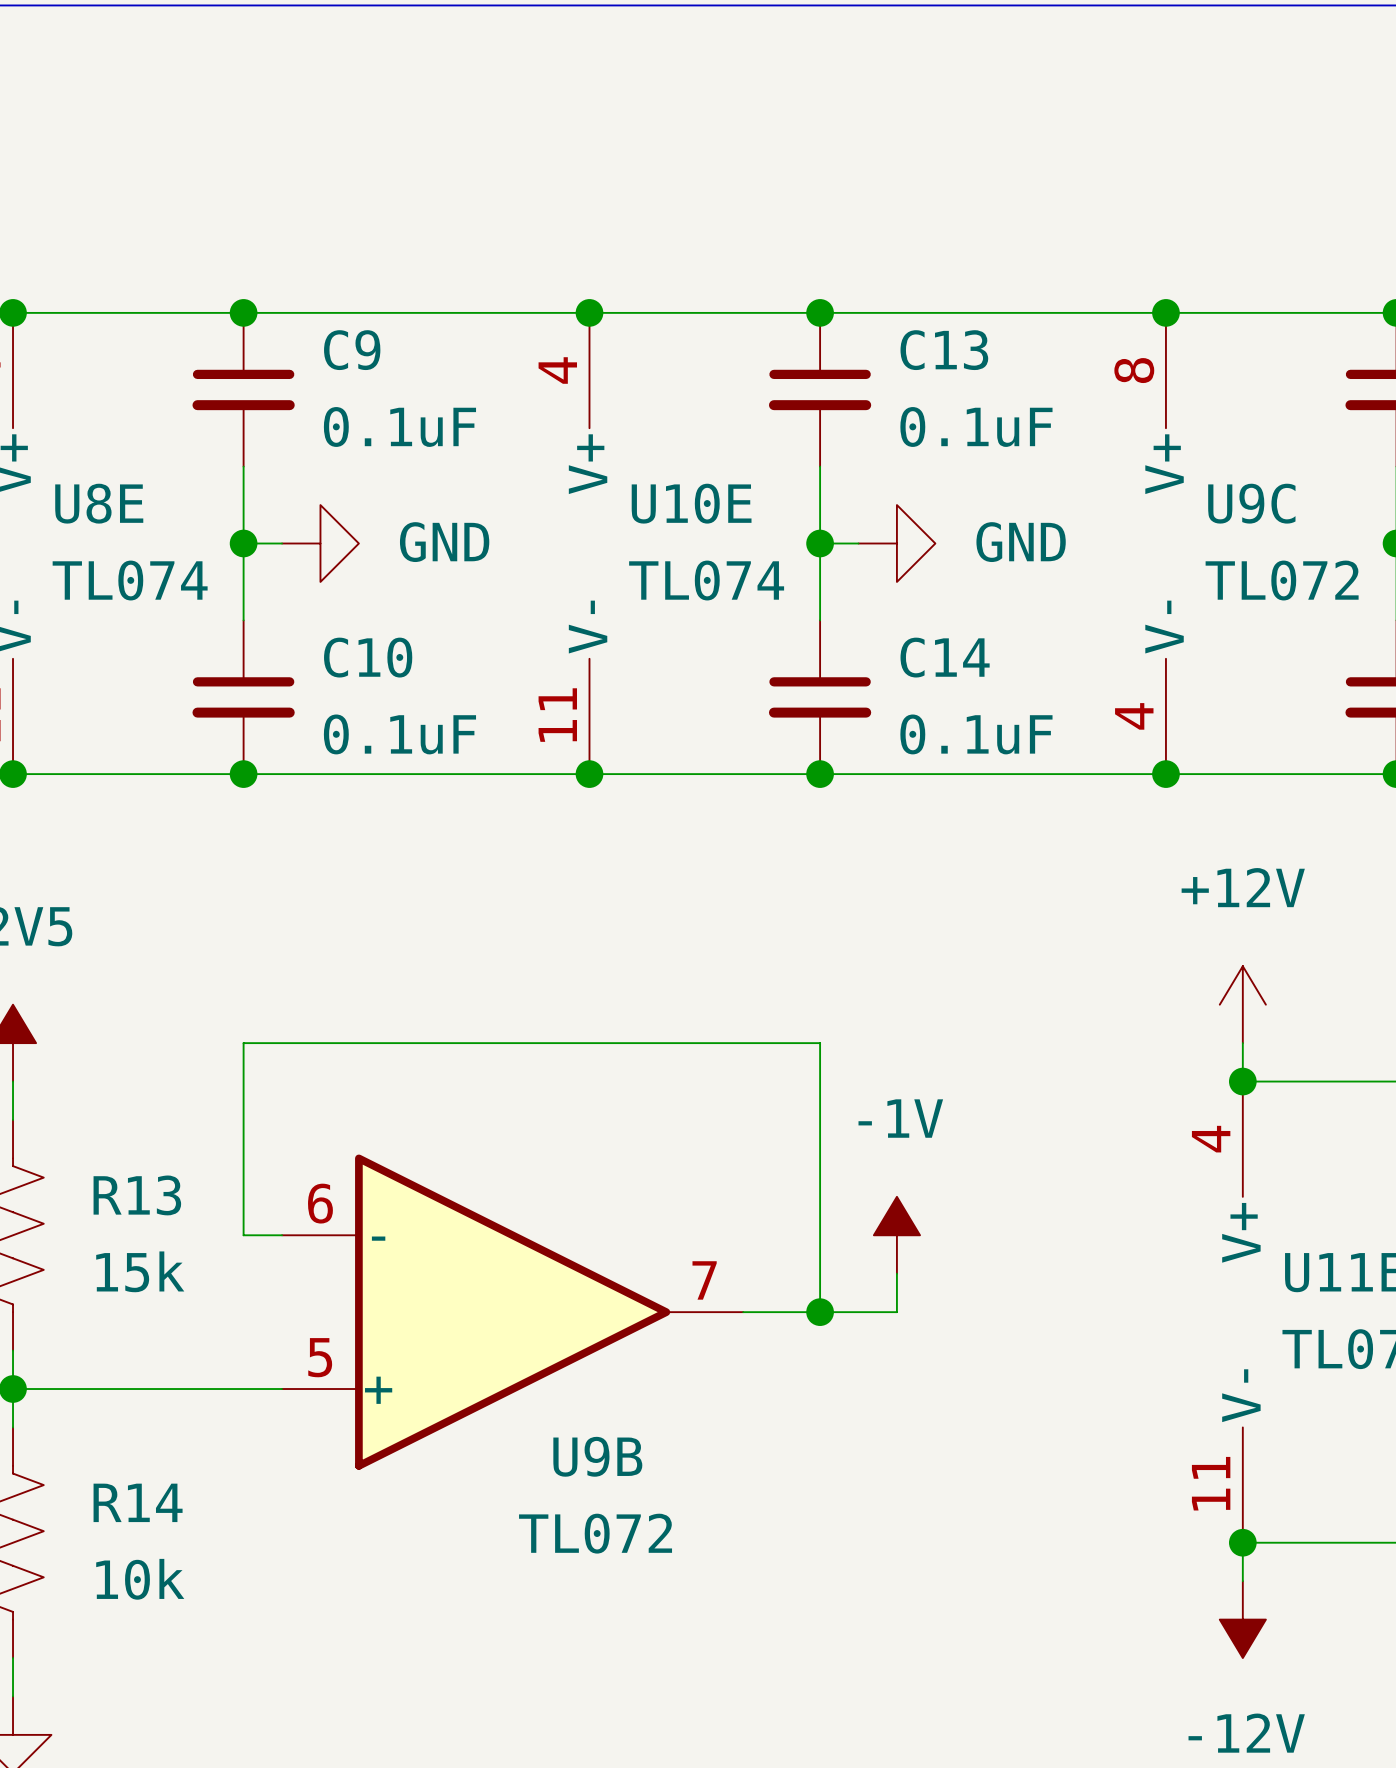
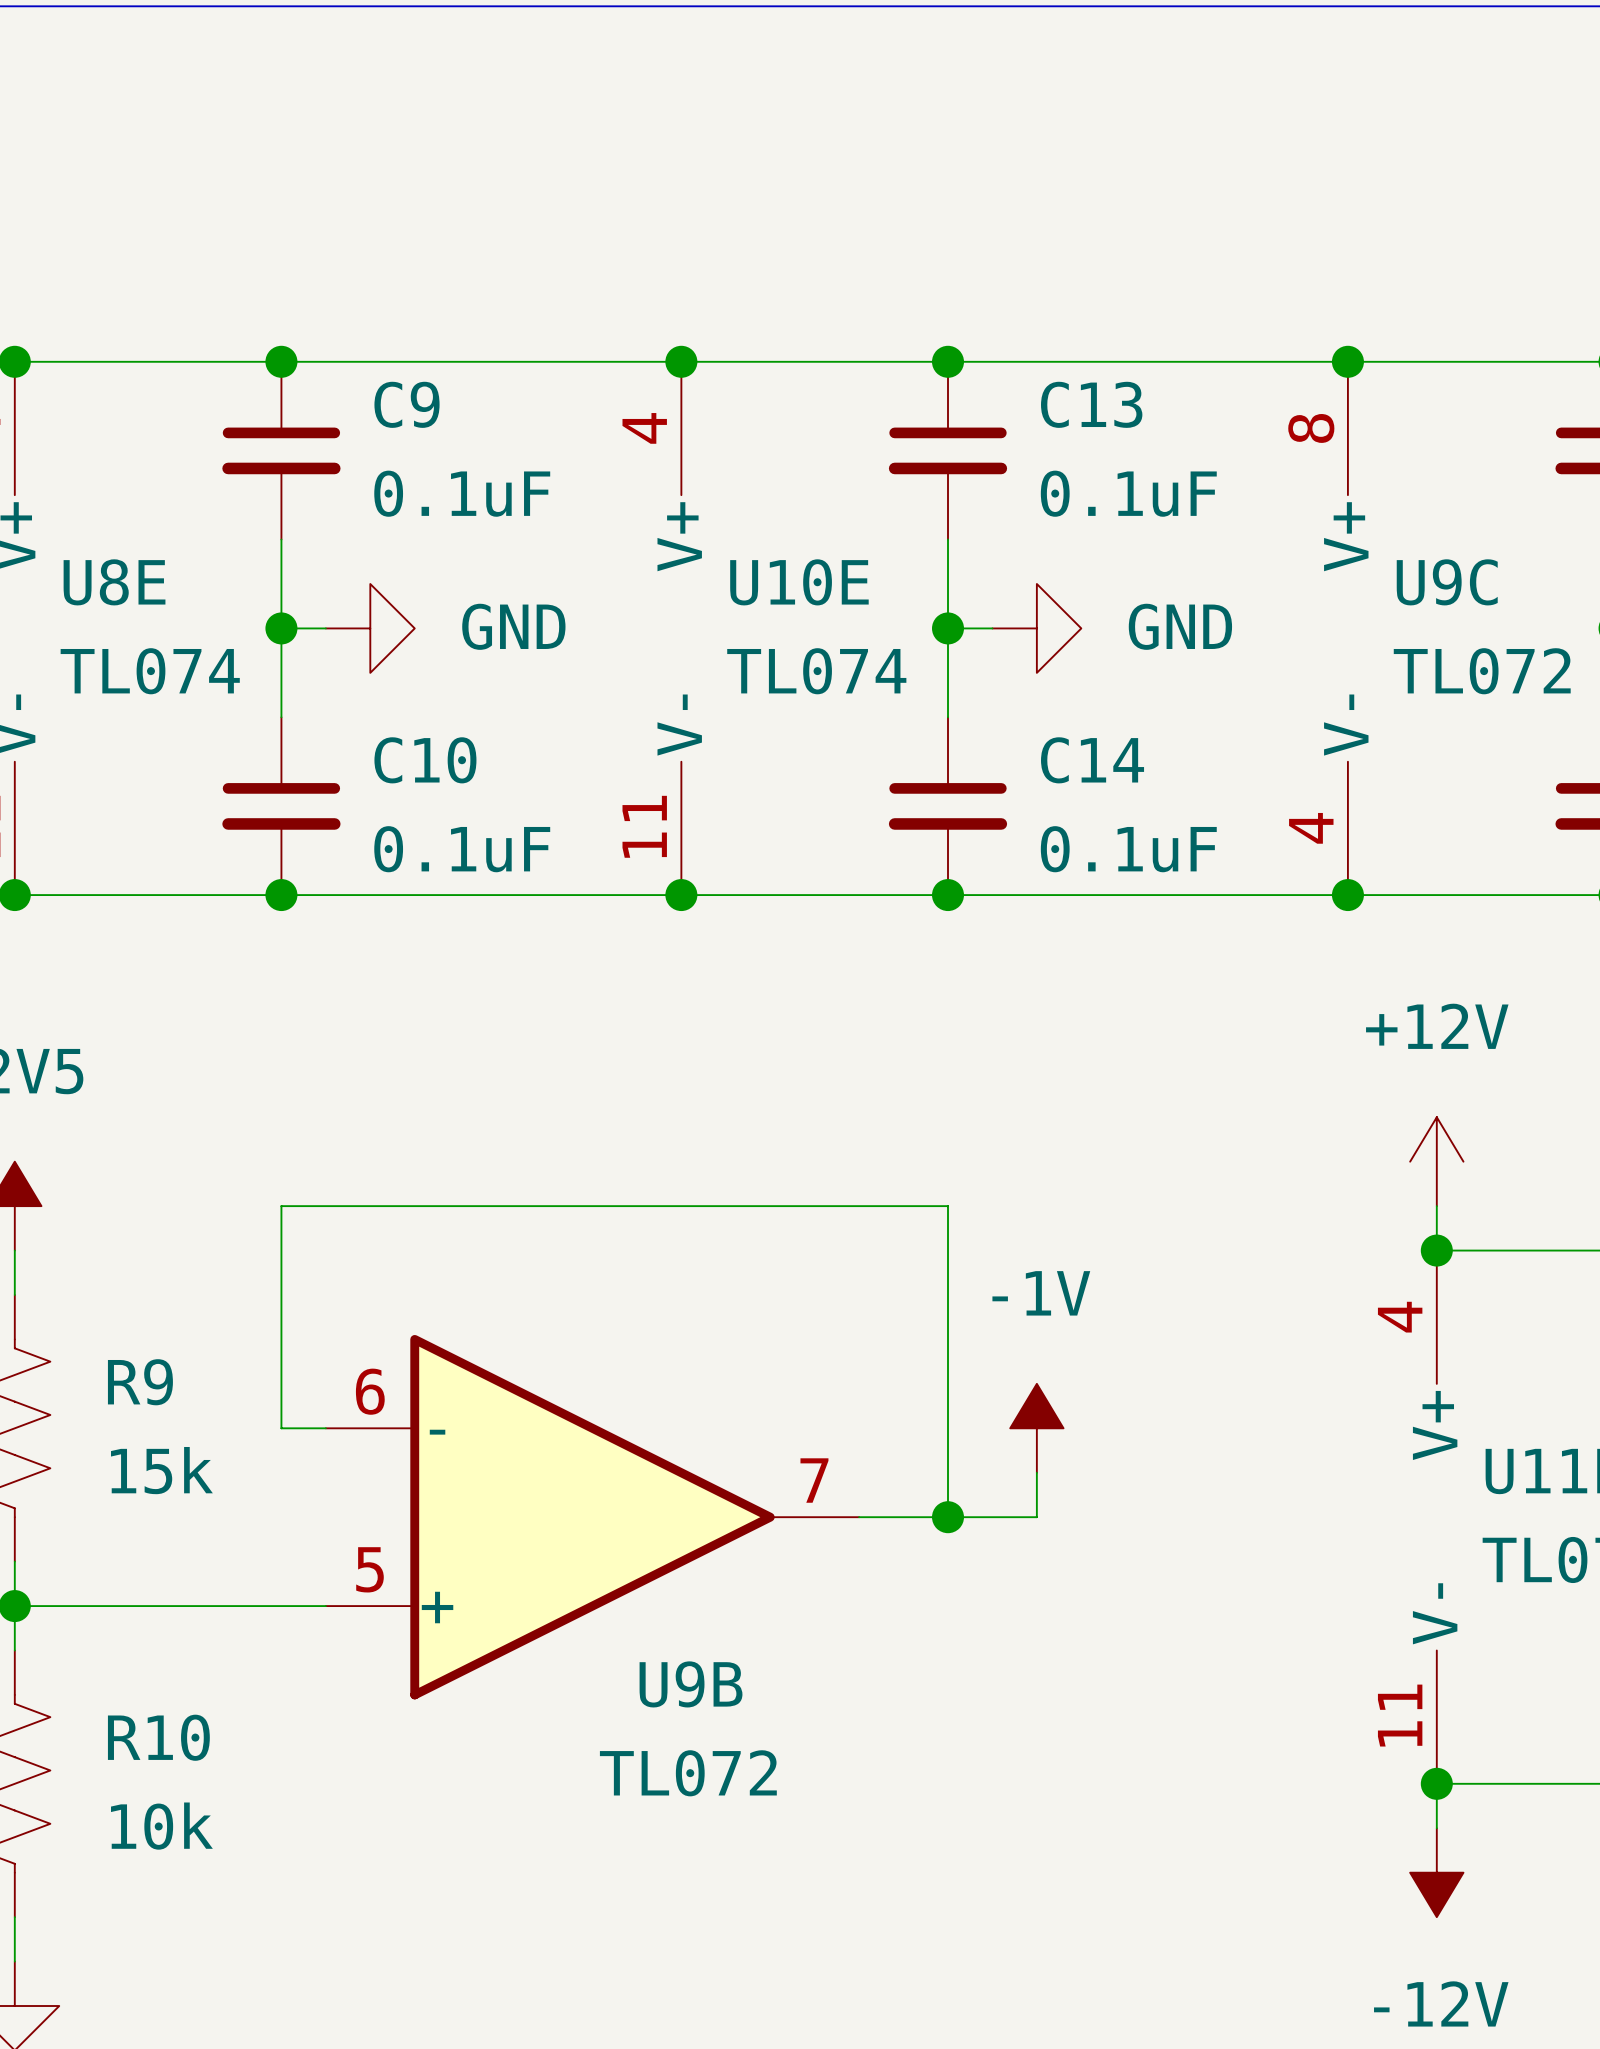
R13 name: R13 (137, 1195) -> R9 (140, 1382)
R14 name: R14 (138, 1502) -> R10 (158, 1737)

